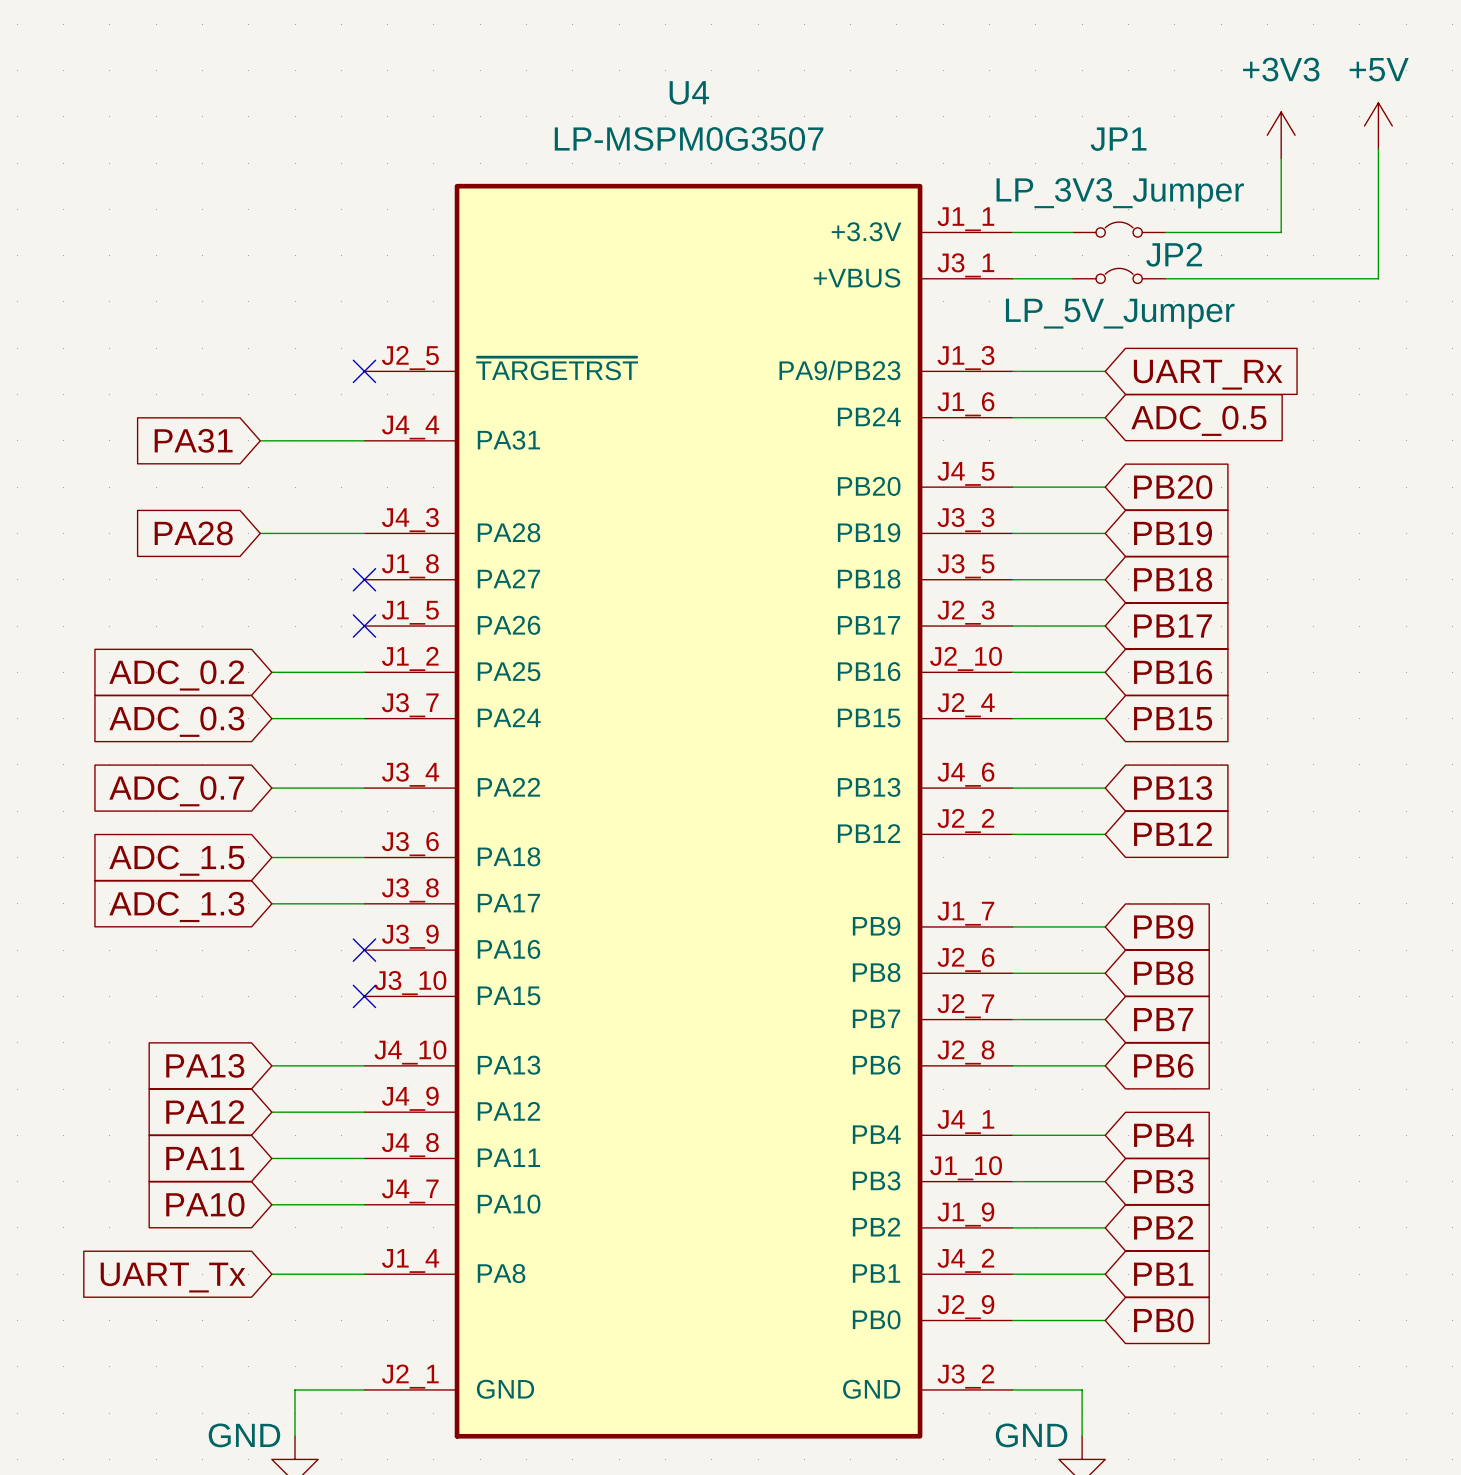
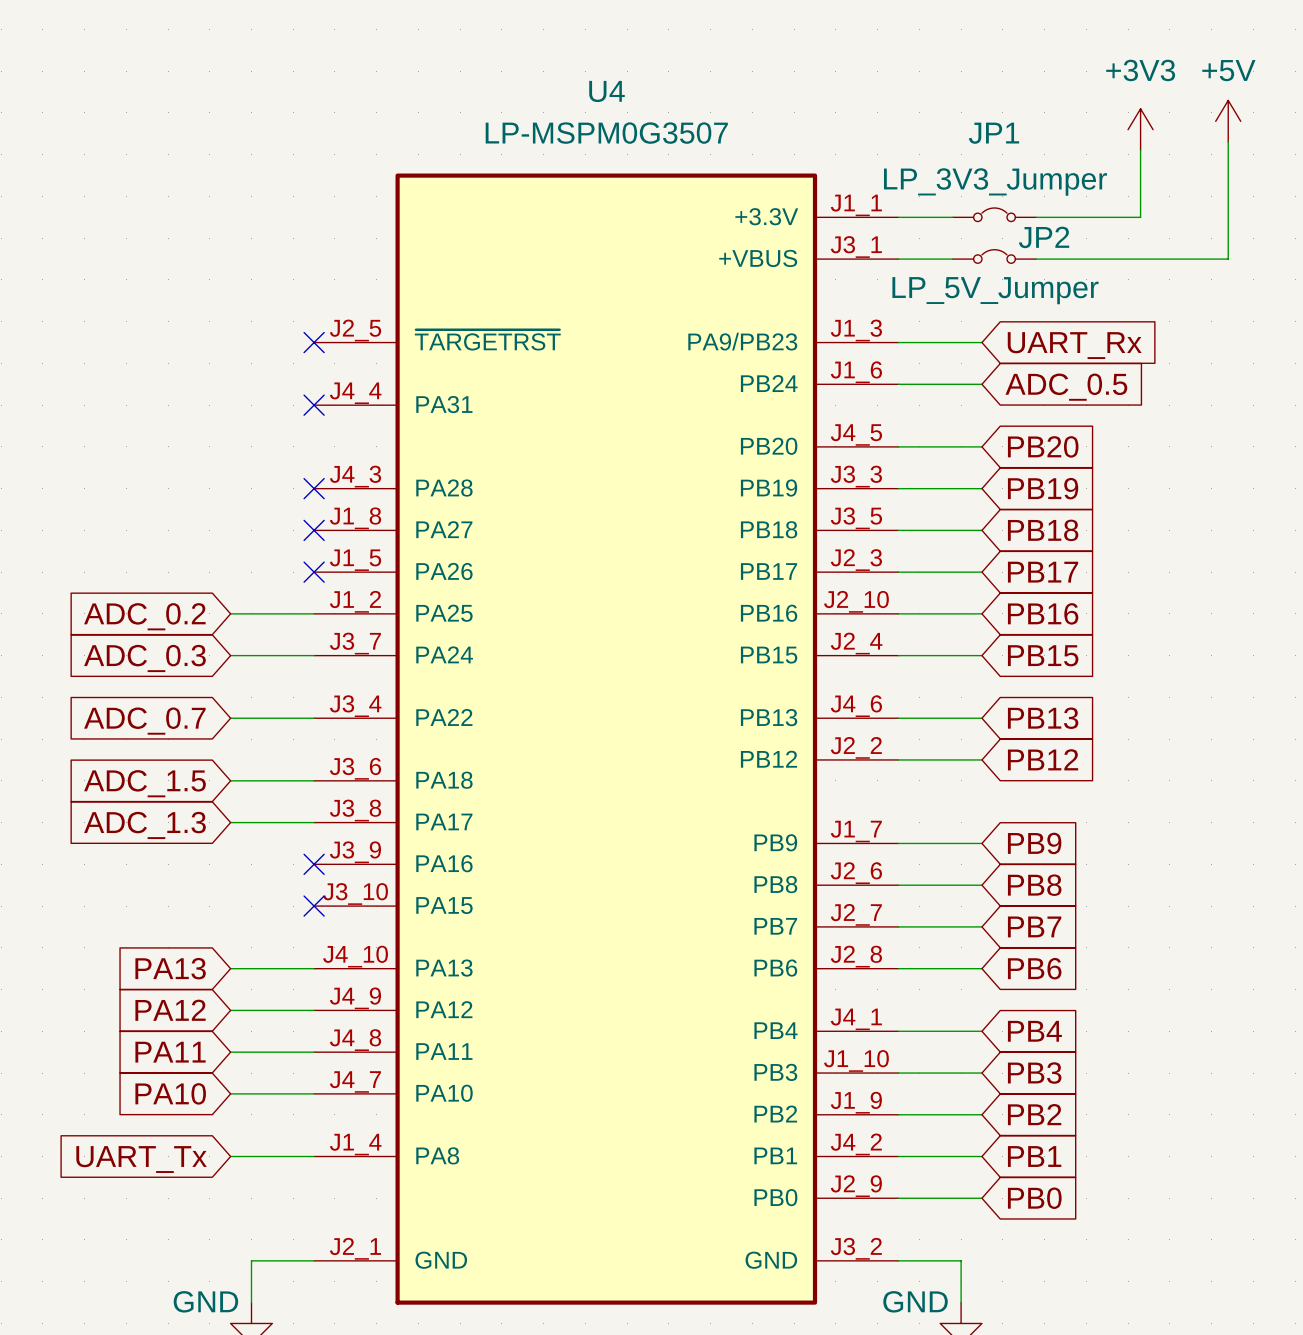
global label: PA31 (193, 440) -> none
wire: (260, 440) (364, 440) -> none
no-connect mark: none -> (314, 405)
global label: PA28 (193, 533) -> none
wire: (260, 533) (364, 533) -> none
no-connect mark: none -> (314, 488)

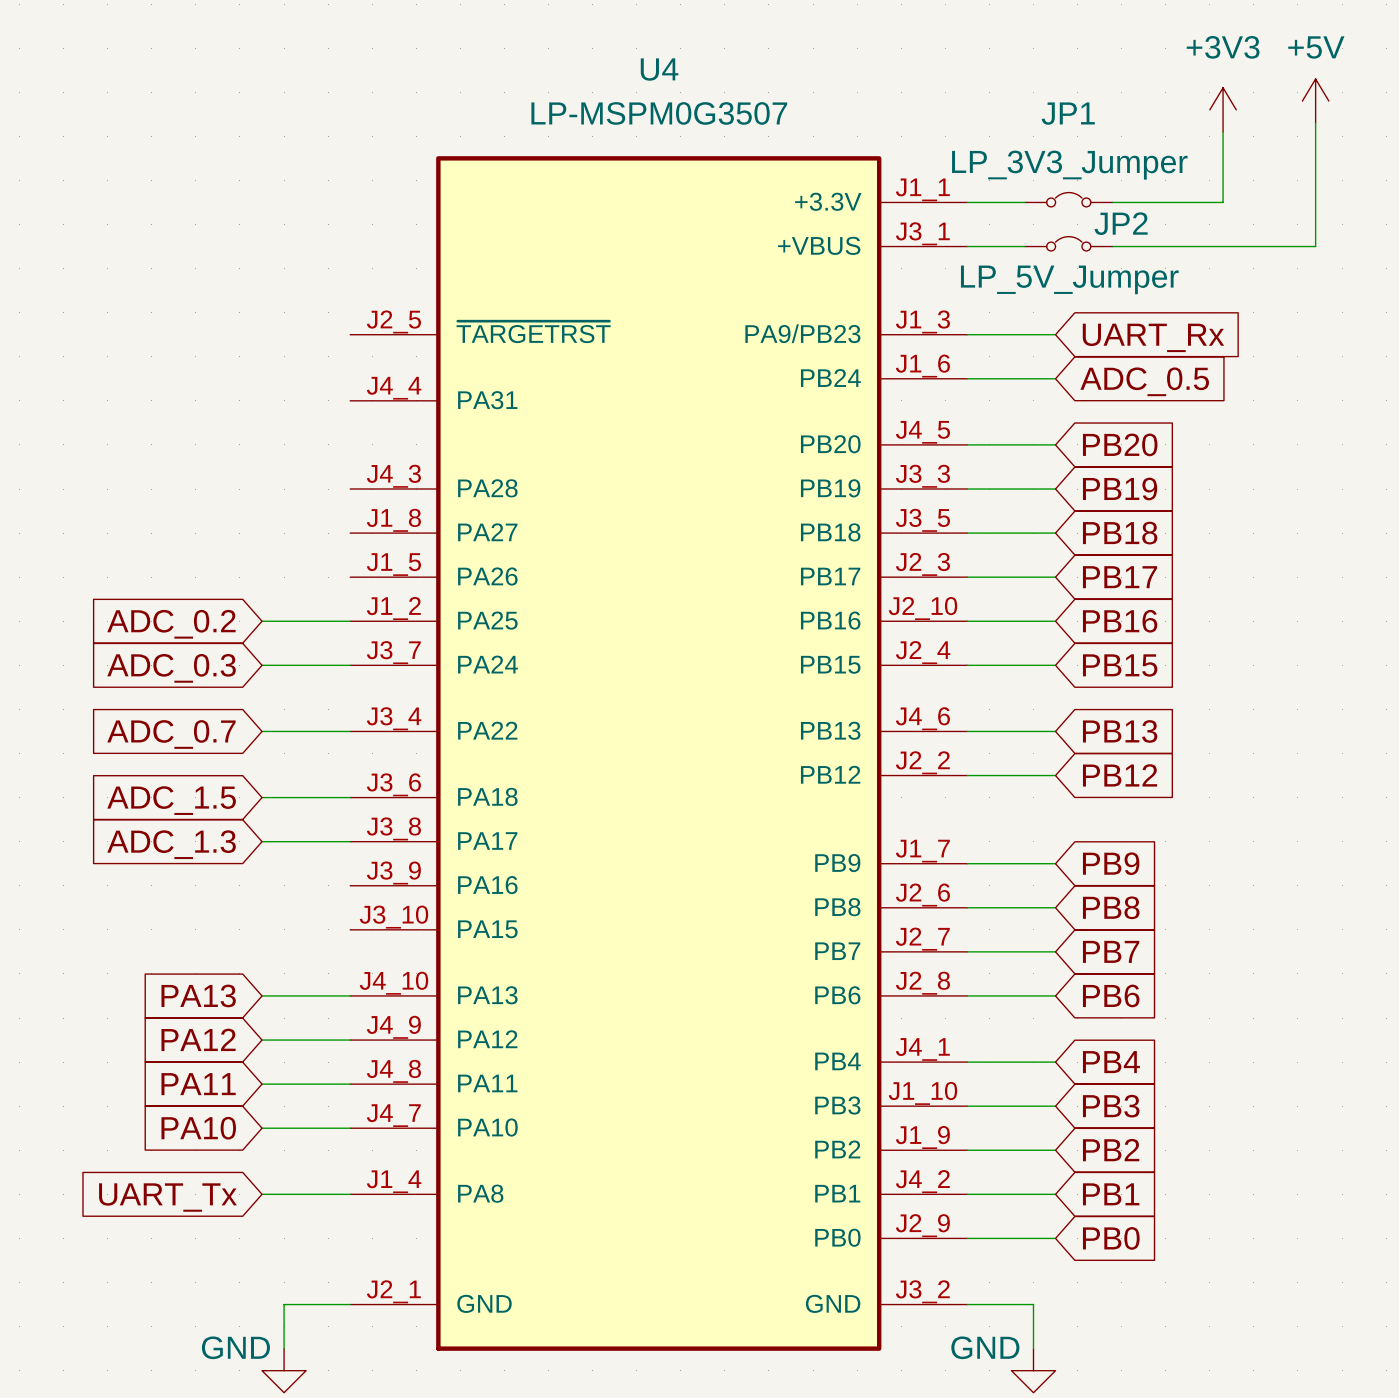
no-connect mark: (314, 342) -> none
no-connect mark: (314, 405) -> none
no-connect mark: (314, 488) -> none
no-connect mark: (314, 530) -> none
no-connect mark: (314, 572) -> none
no-connect mark: (314, 864) -> none
no-connect mark: (314, 906) -> none

